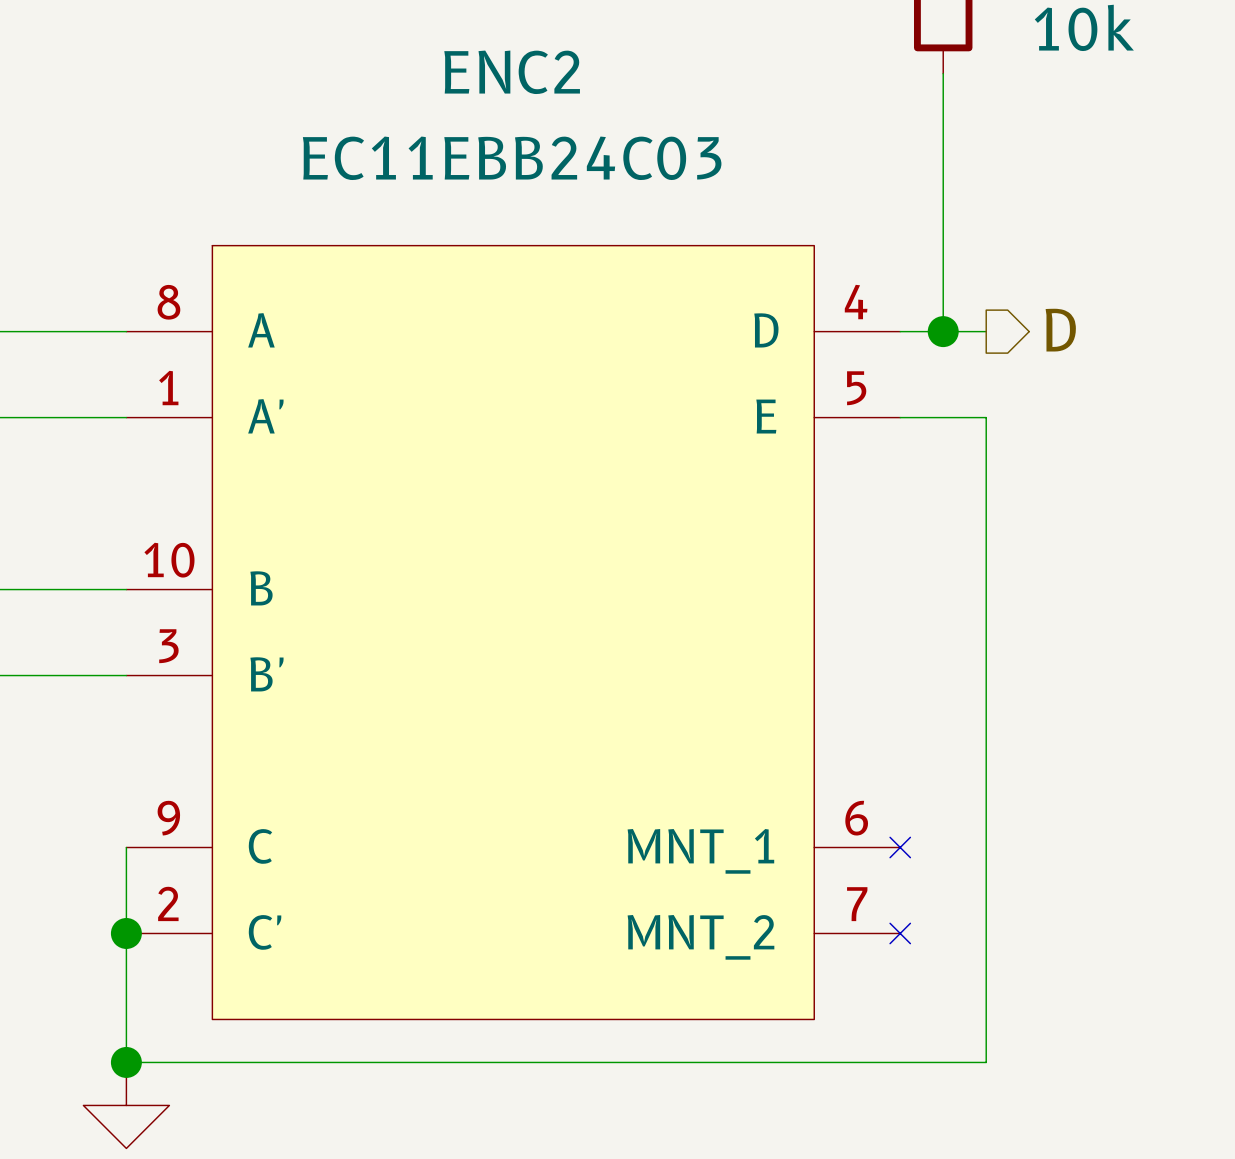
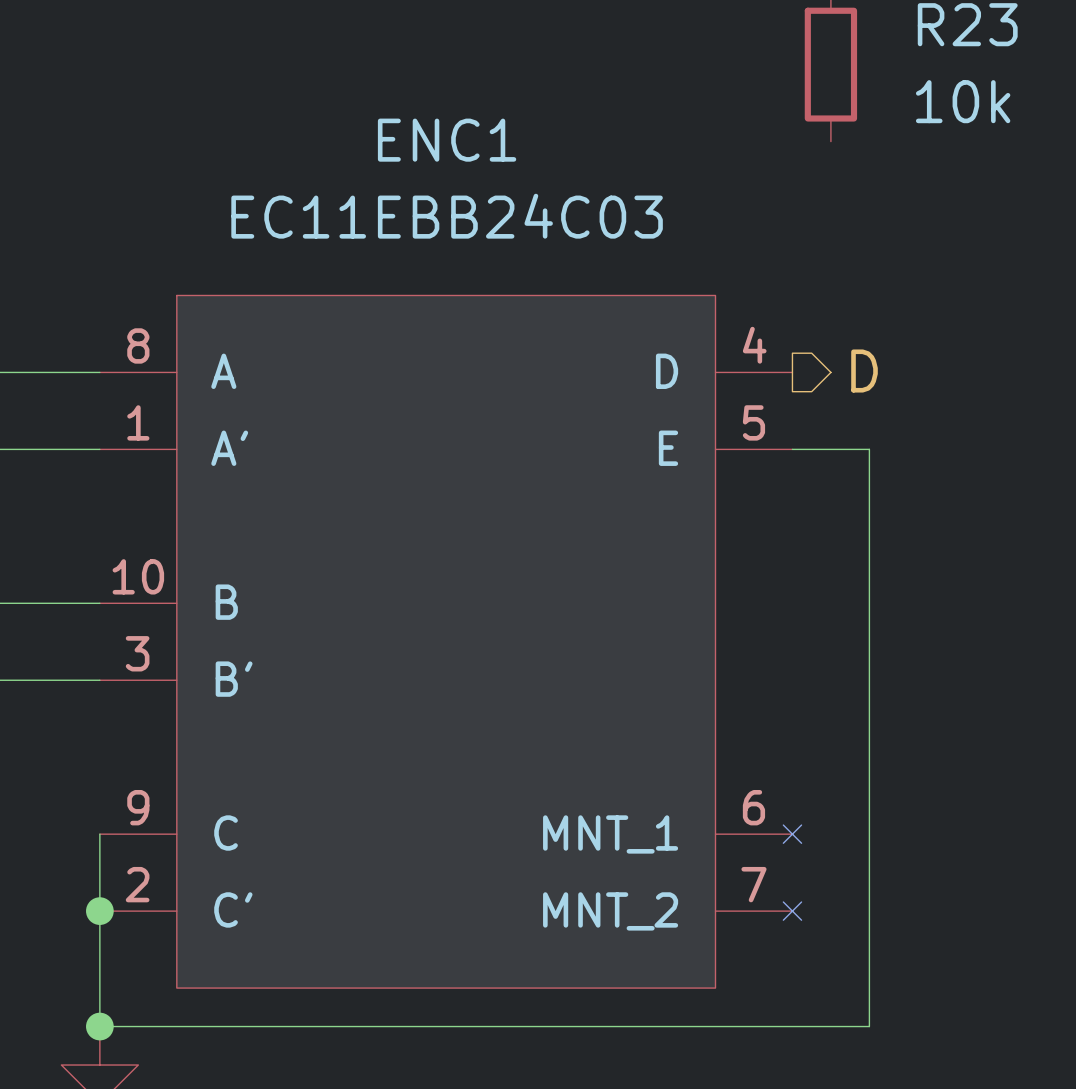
ENC2 name: ENC2 (512, 72) -> ENC1 (447, 140)
wire: (943, 73) (943, 331) -> none
hierarchical label position: D (1060, 330) -> D (864, 371)
wire: (900, 331) (986, 331) -> none
junction: (943, 331) -> none

